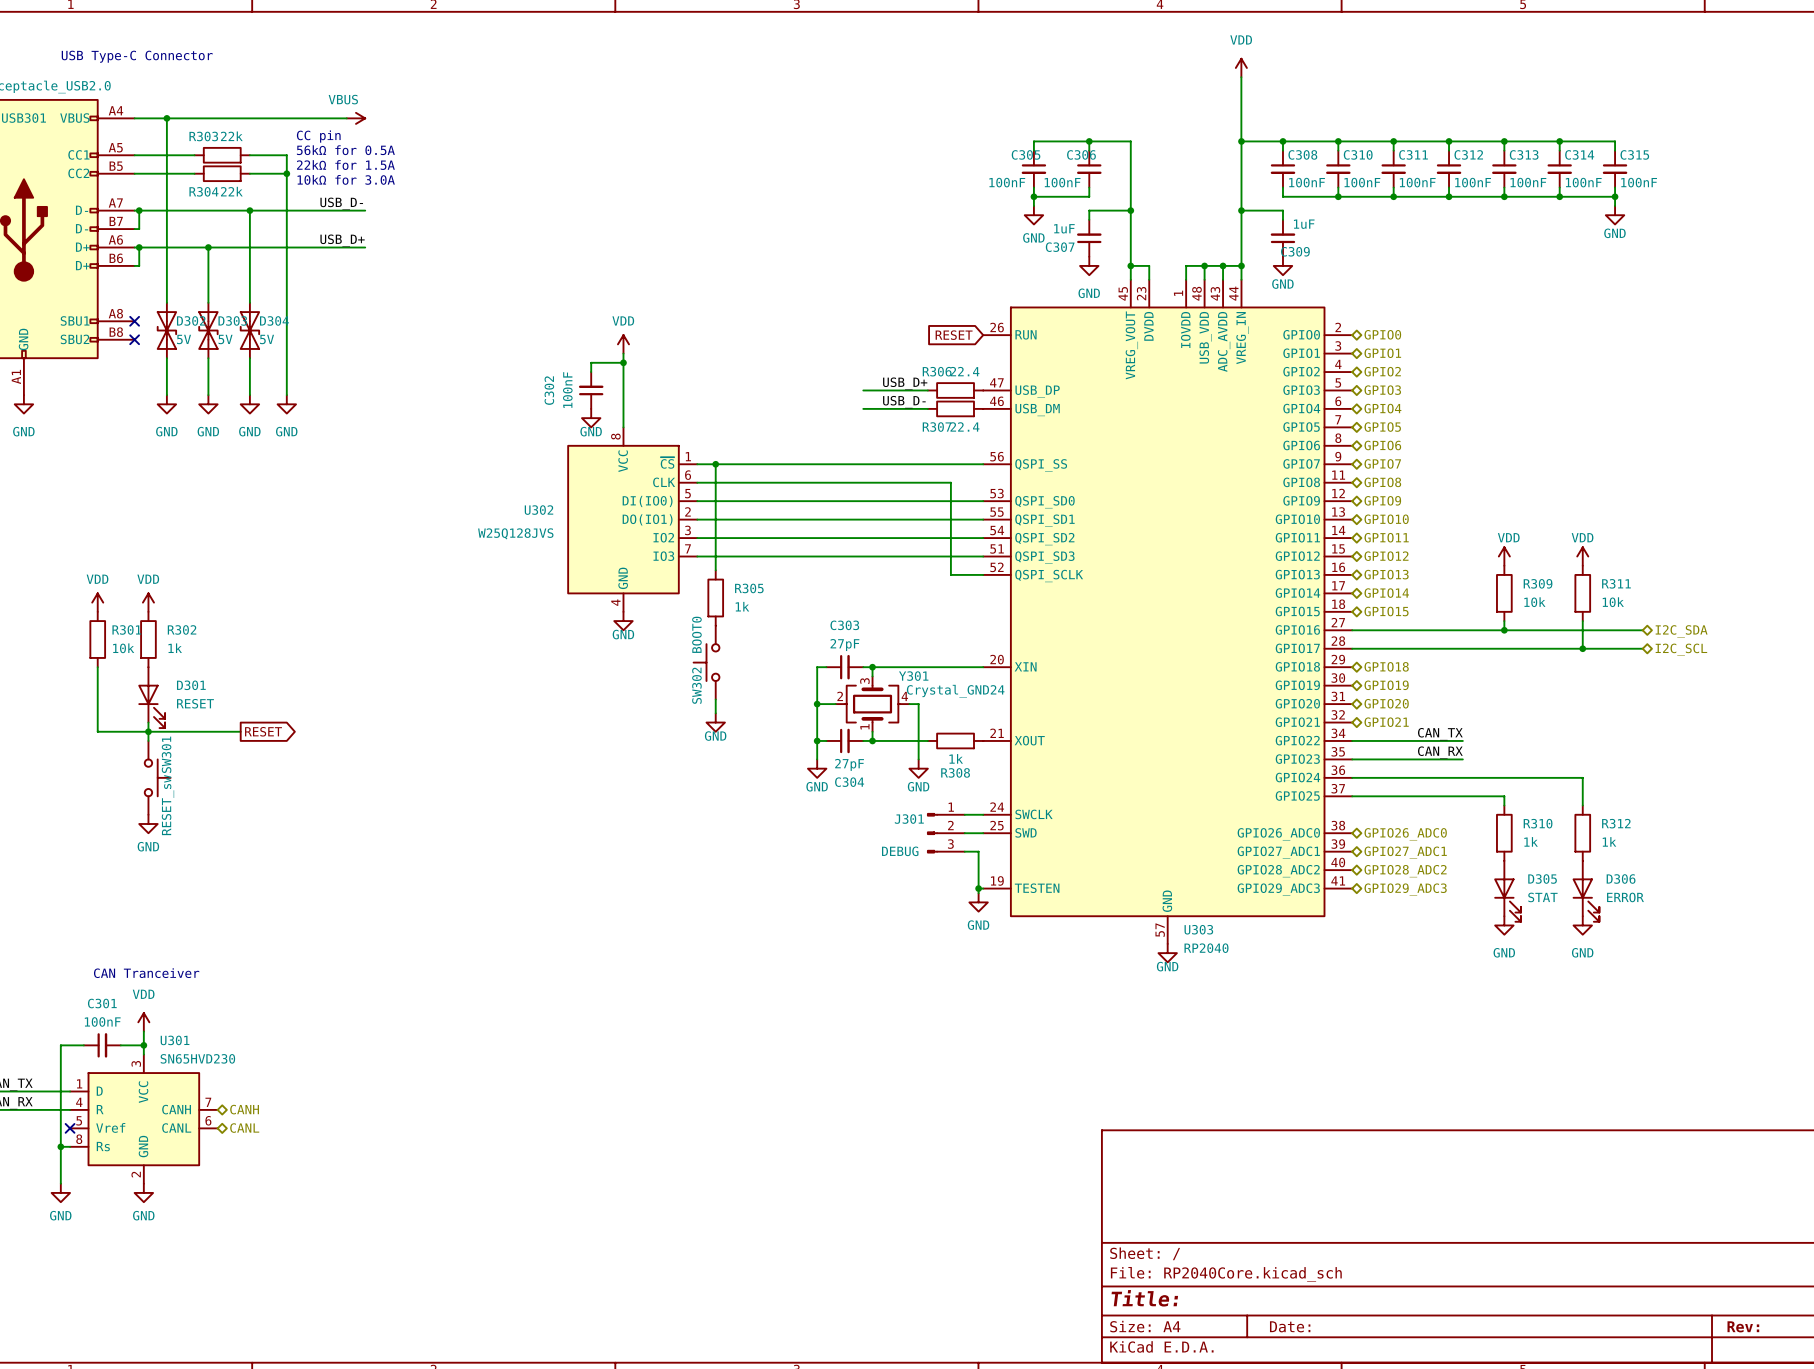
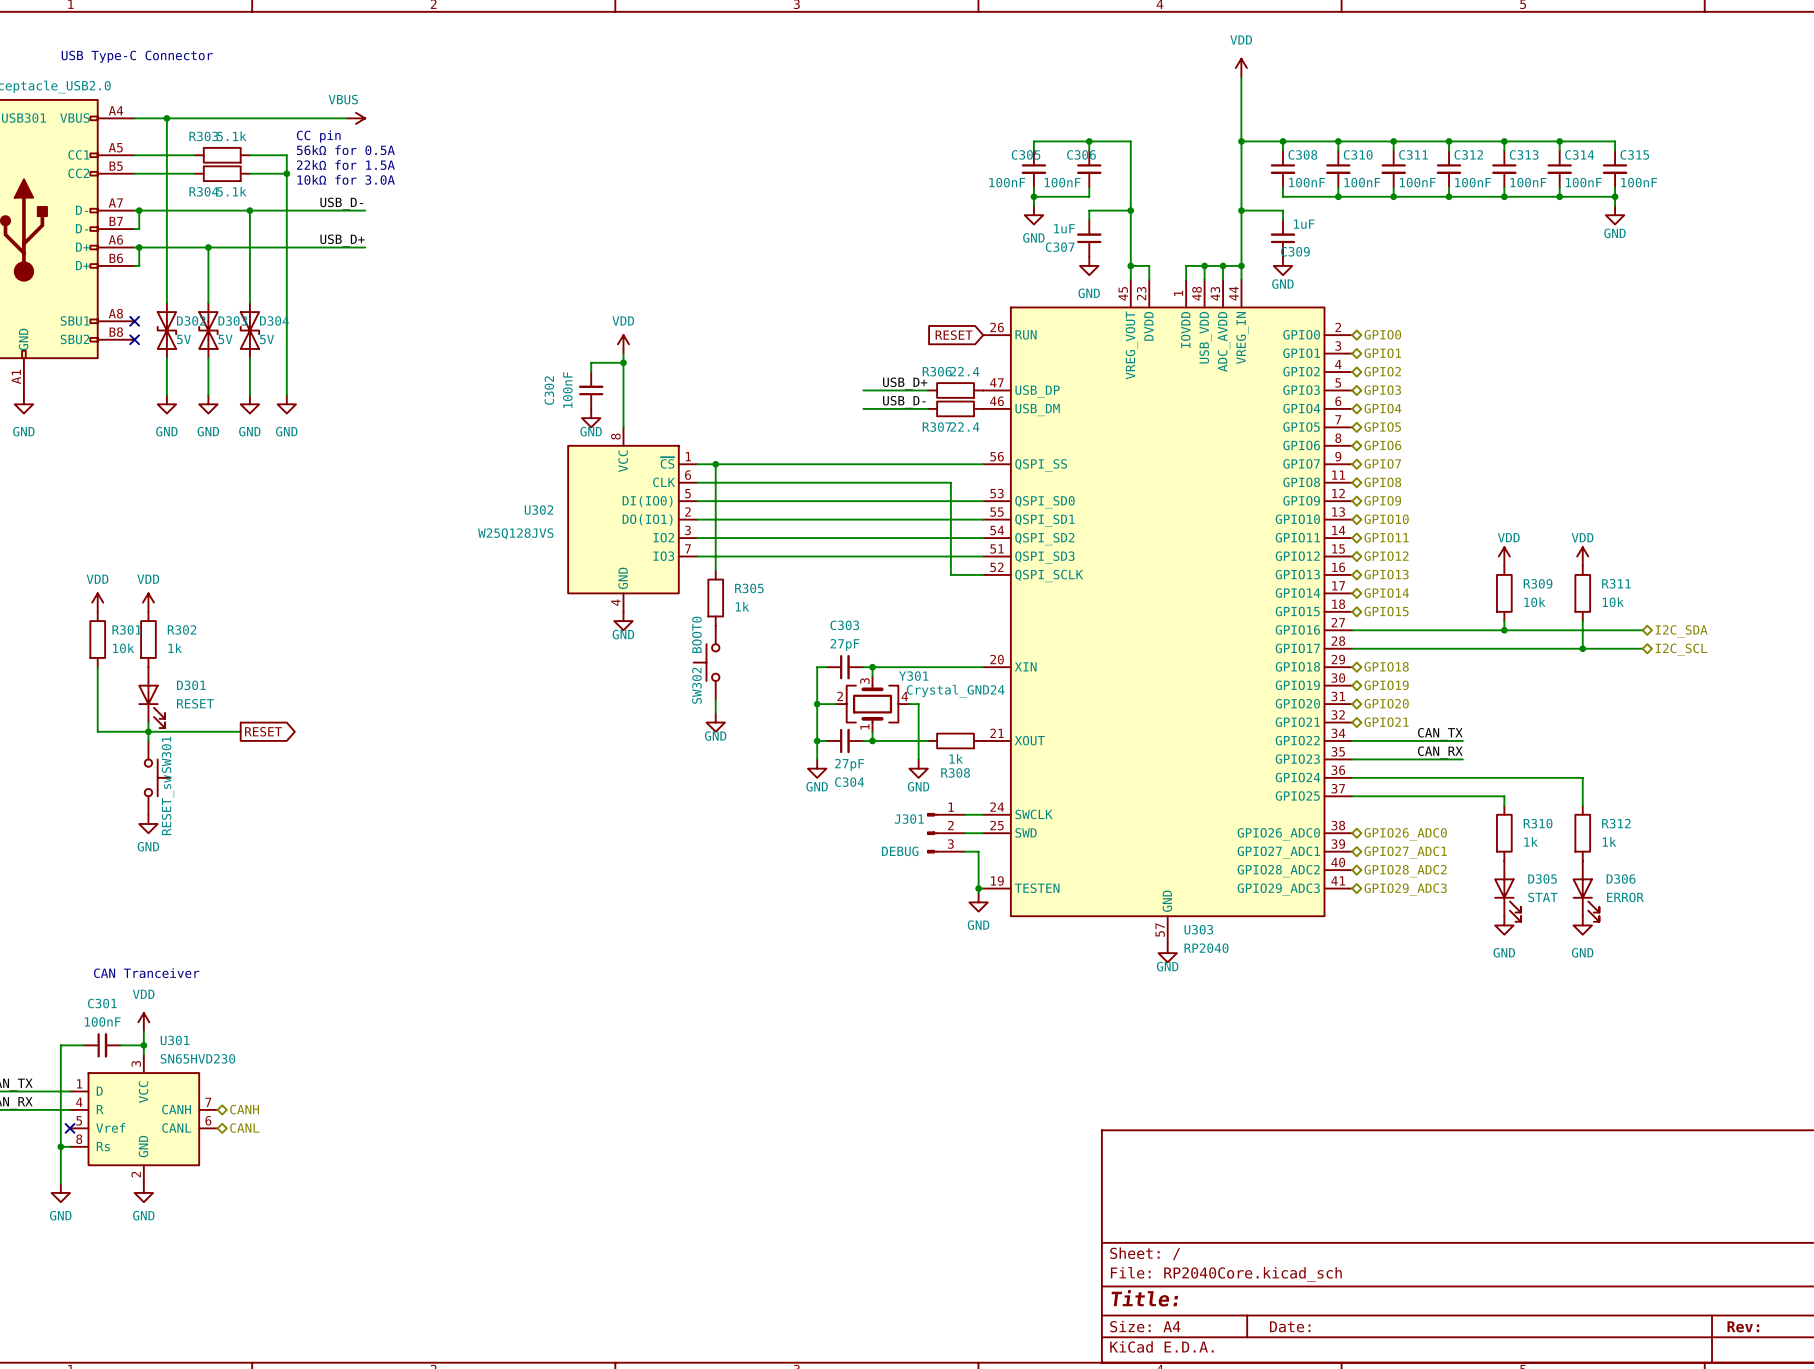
R303 value: 22k (231, 136) -> 5.1k (231, 136)
R304 value: 22k (231, 191) -> 5.1k (231, 191)

